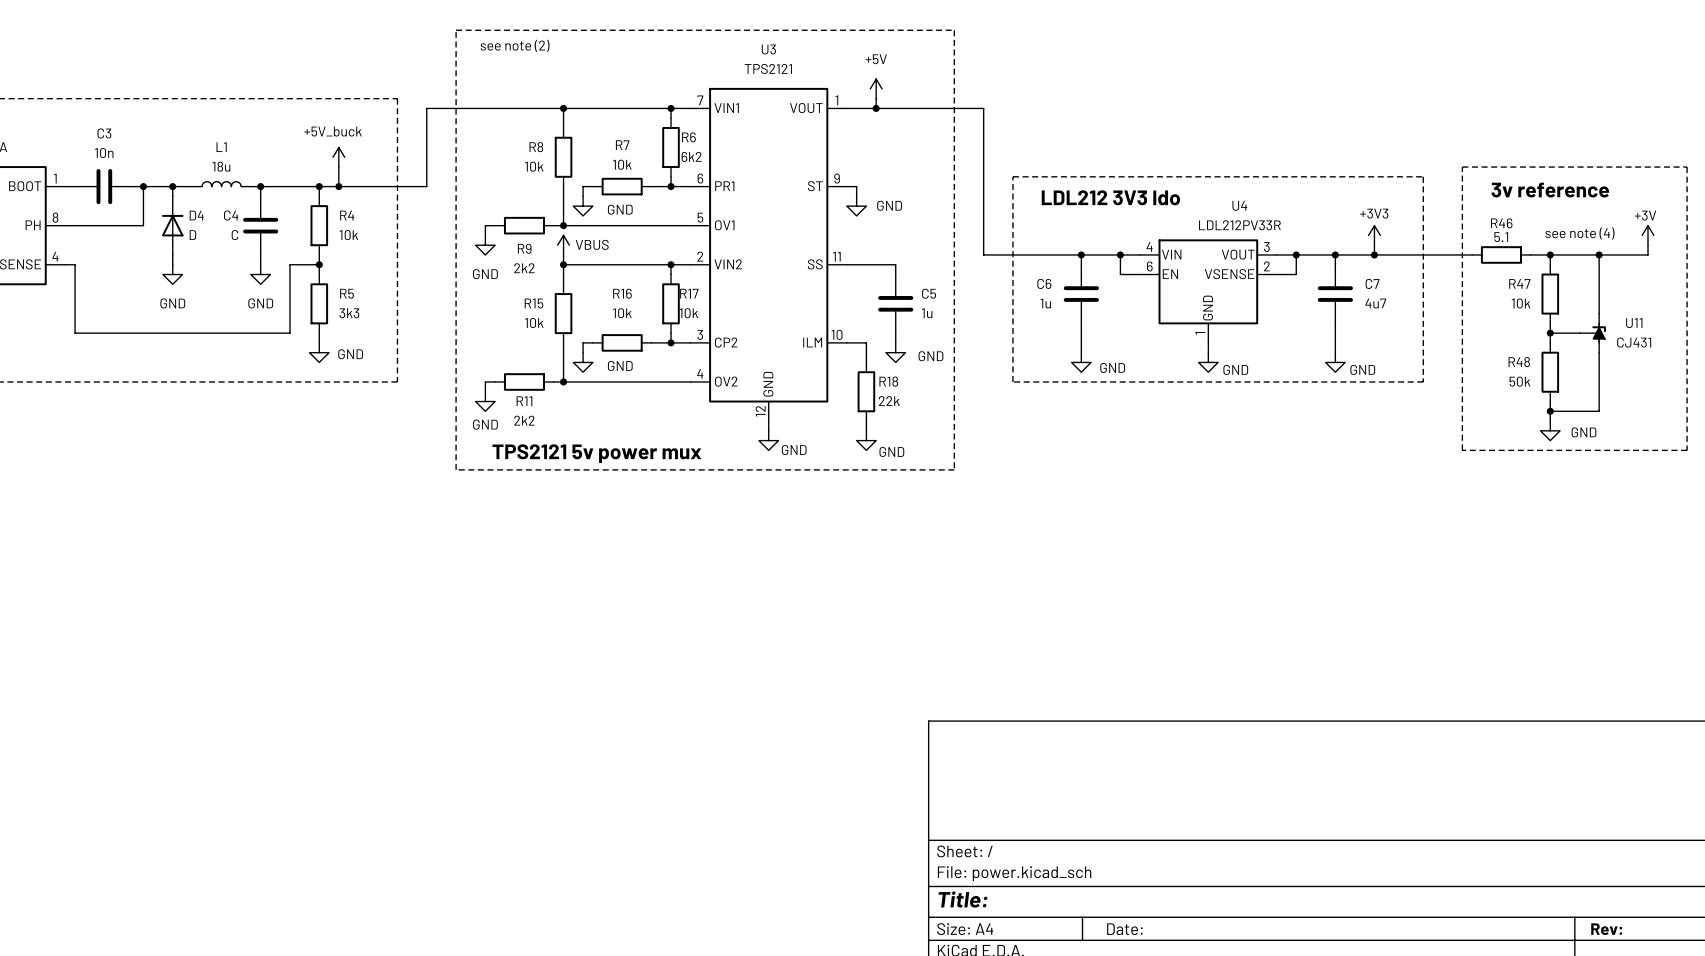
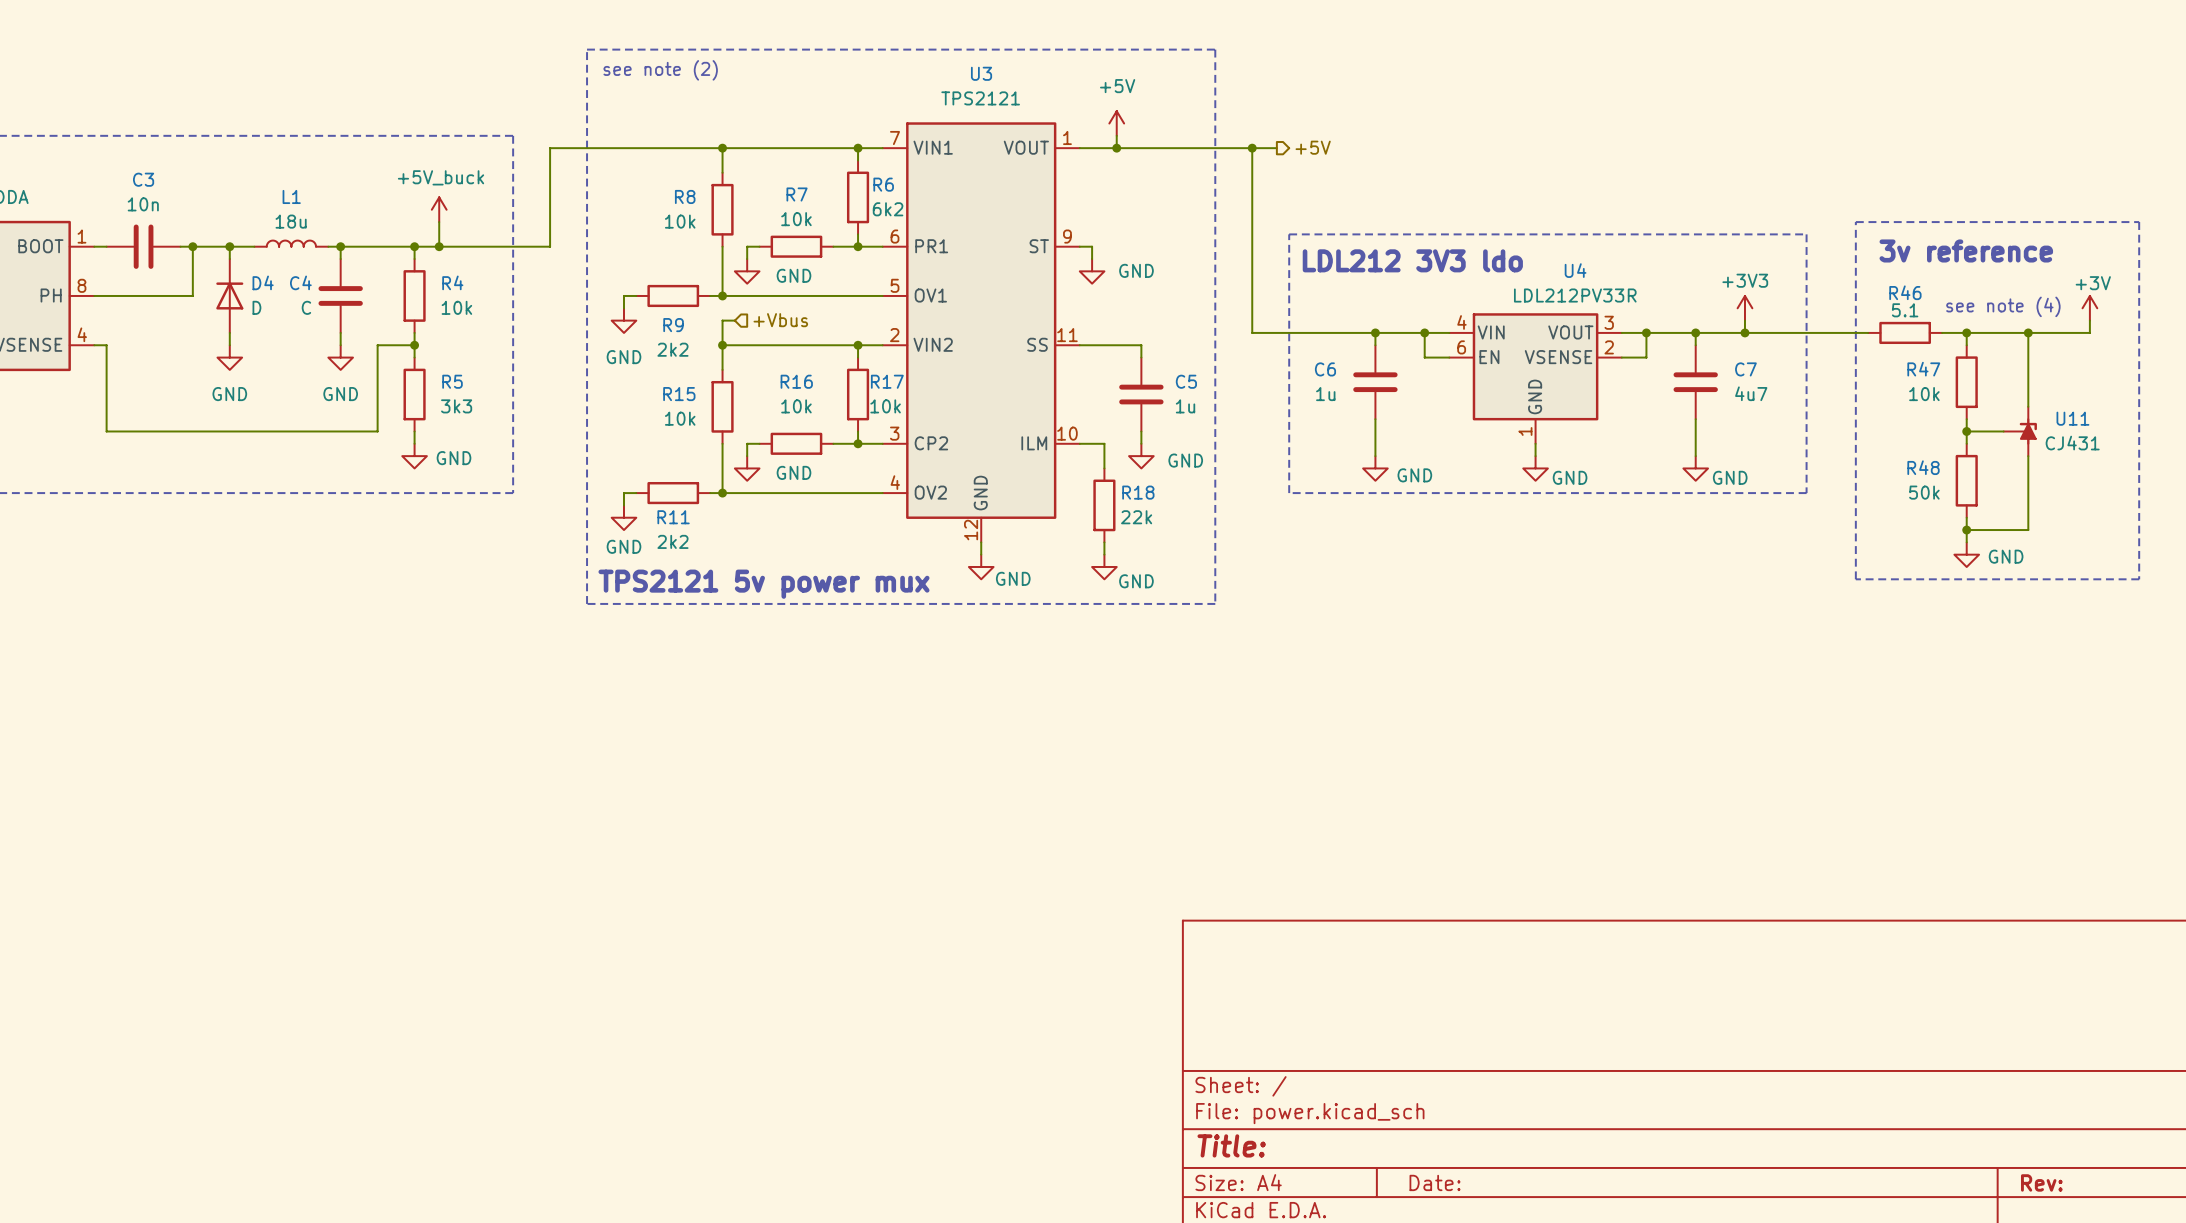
wire: none -> (1252, 148) (1276, 148)
junction: none -> (1252, 148)
hierarchical label: none -> +5V (1313, 147)
hierarchical label: none -> +Vbus (780, 320)
power symbol: VBUS (563, 245) -> none

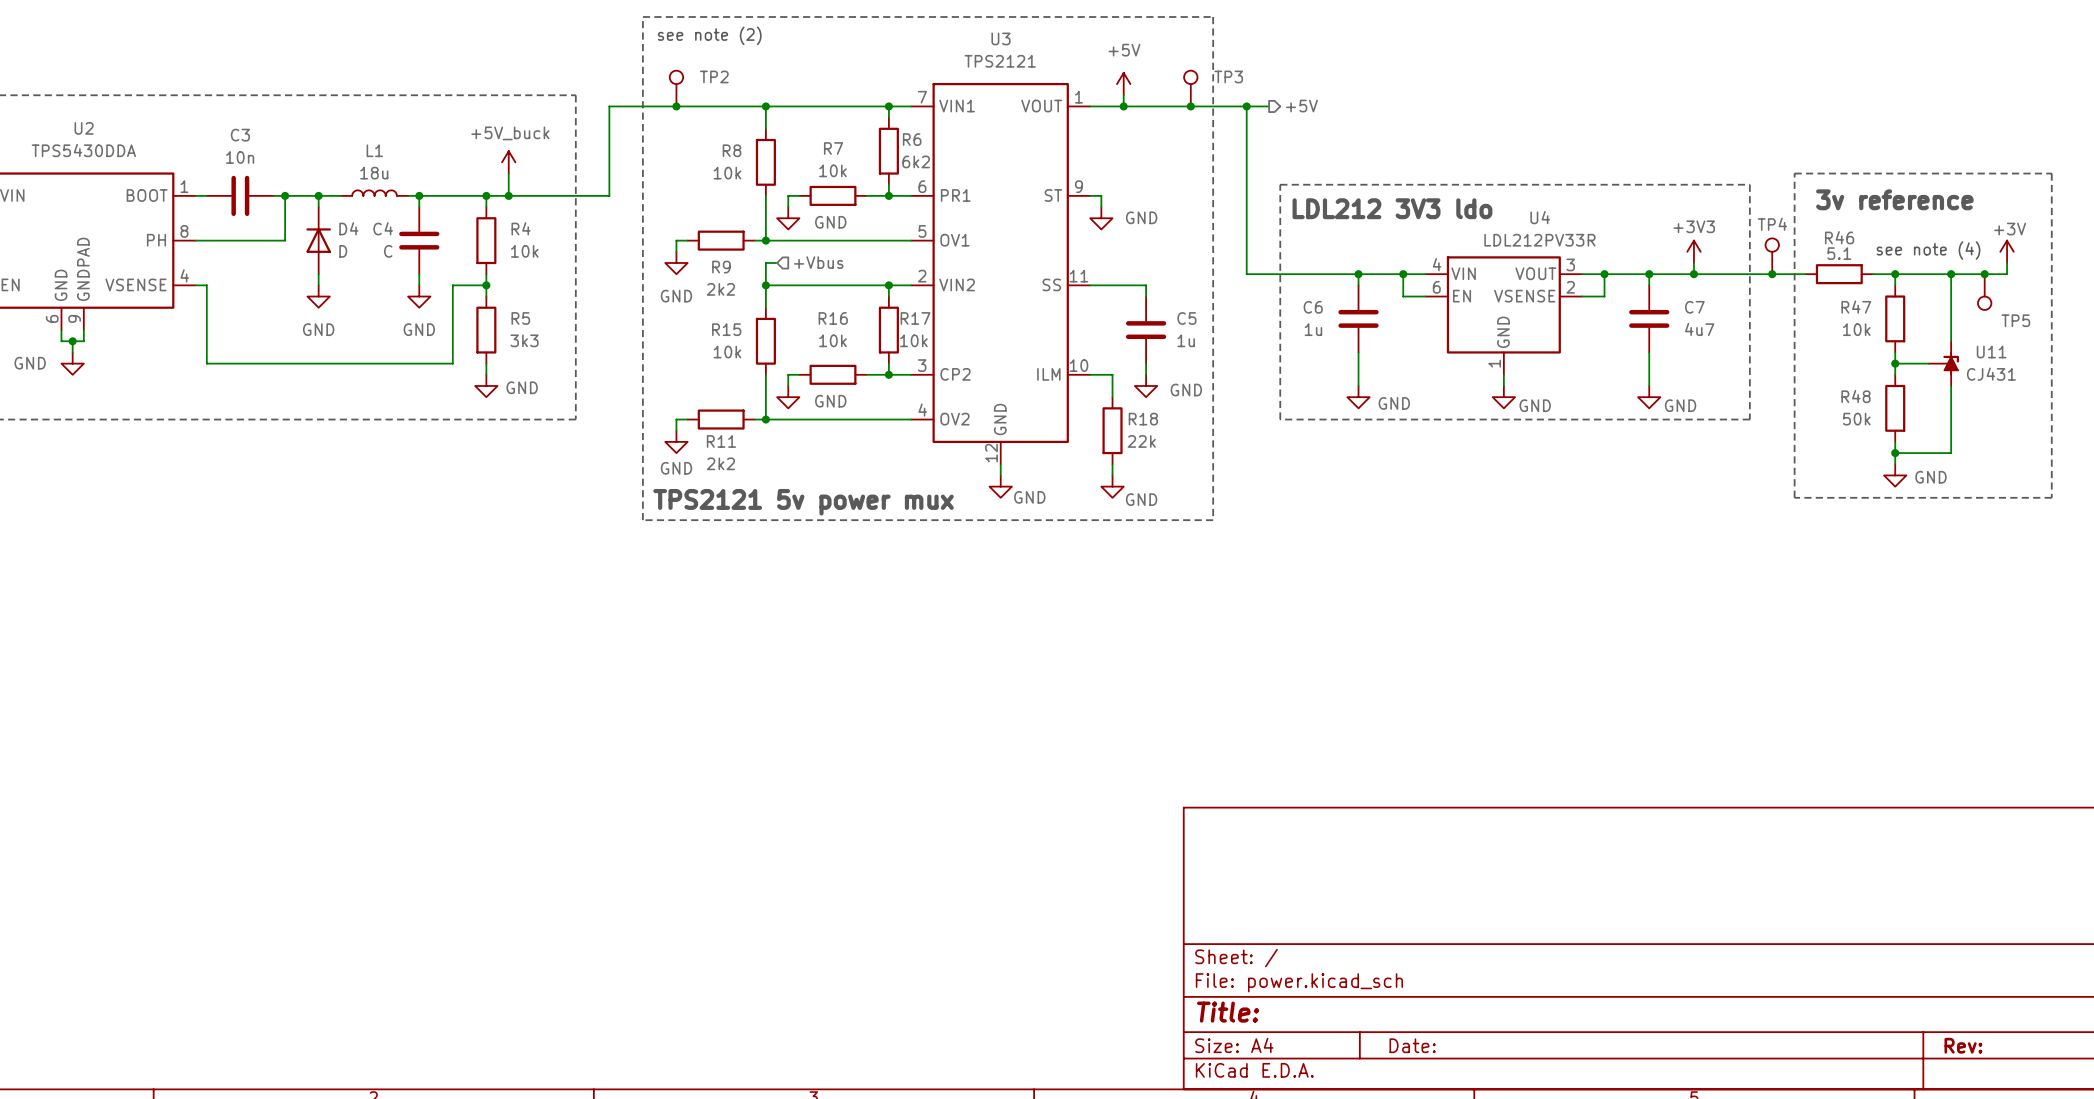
TP2: none -> (676, 88)
TP3: none -> (1190, 88)
junction: none -> (676, 106)
junction: none -> (1190, 106)
TP4: none -> (1772, 256)
junction: none -> (1772, 274)
junction: none -> (1984, 274)
TP5: none -> (1984, 292)

